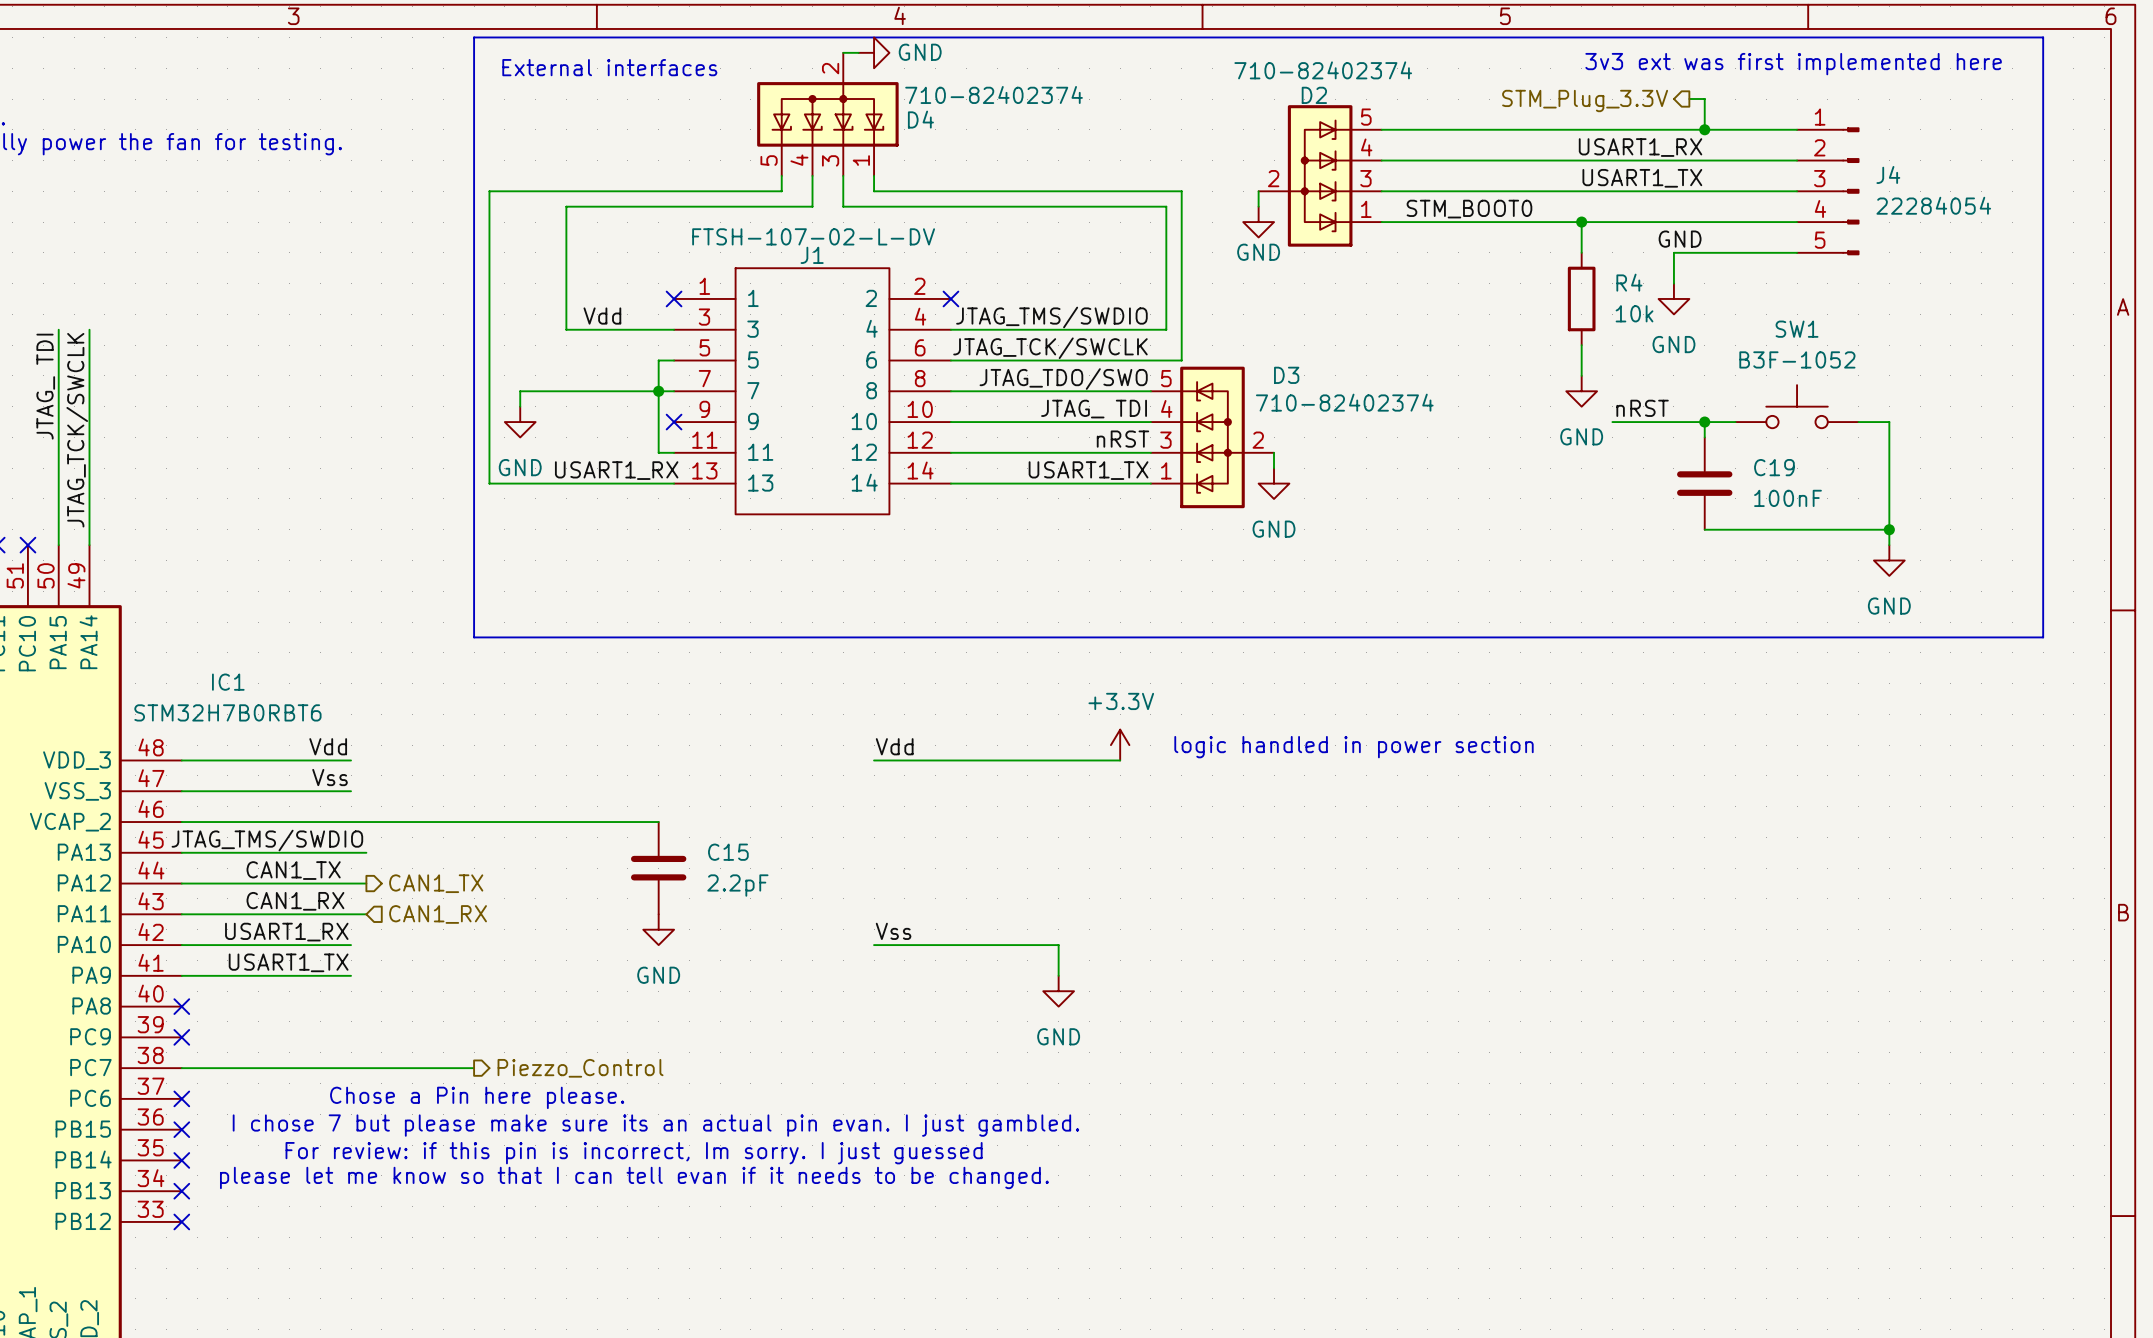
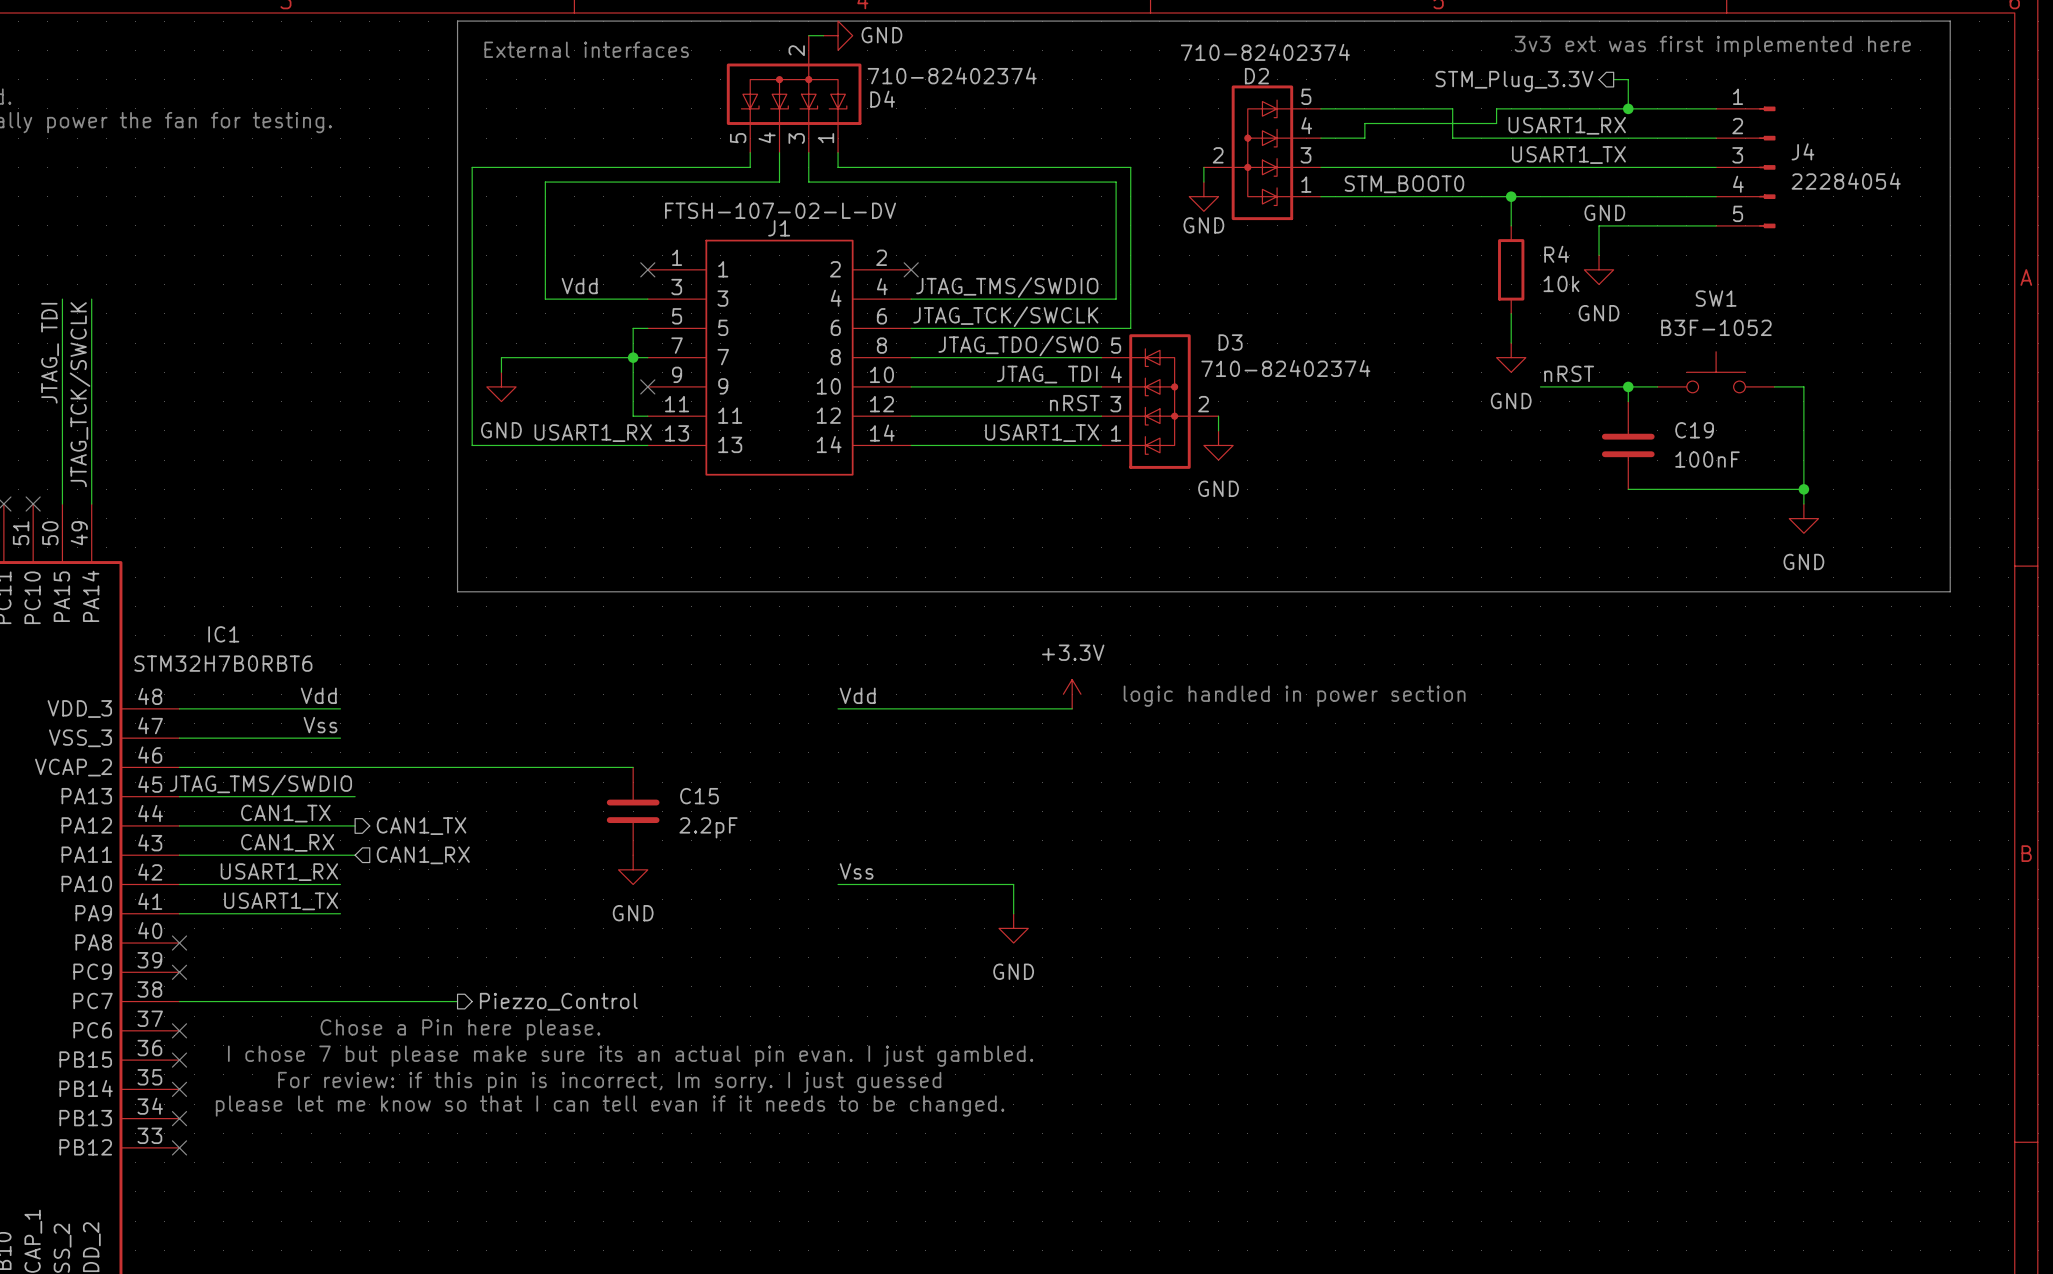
wire: (1520, 129) (1566, 129) -> (1452, 108) (1452, 138)
wire: (1427, 160) (1520, 160) -> (1364, 138) (1364, 123) (1496, 123) (1496, 108)

